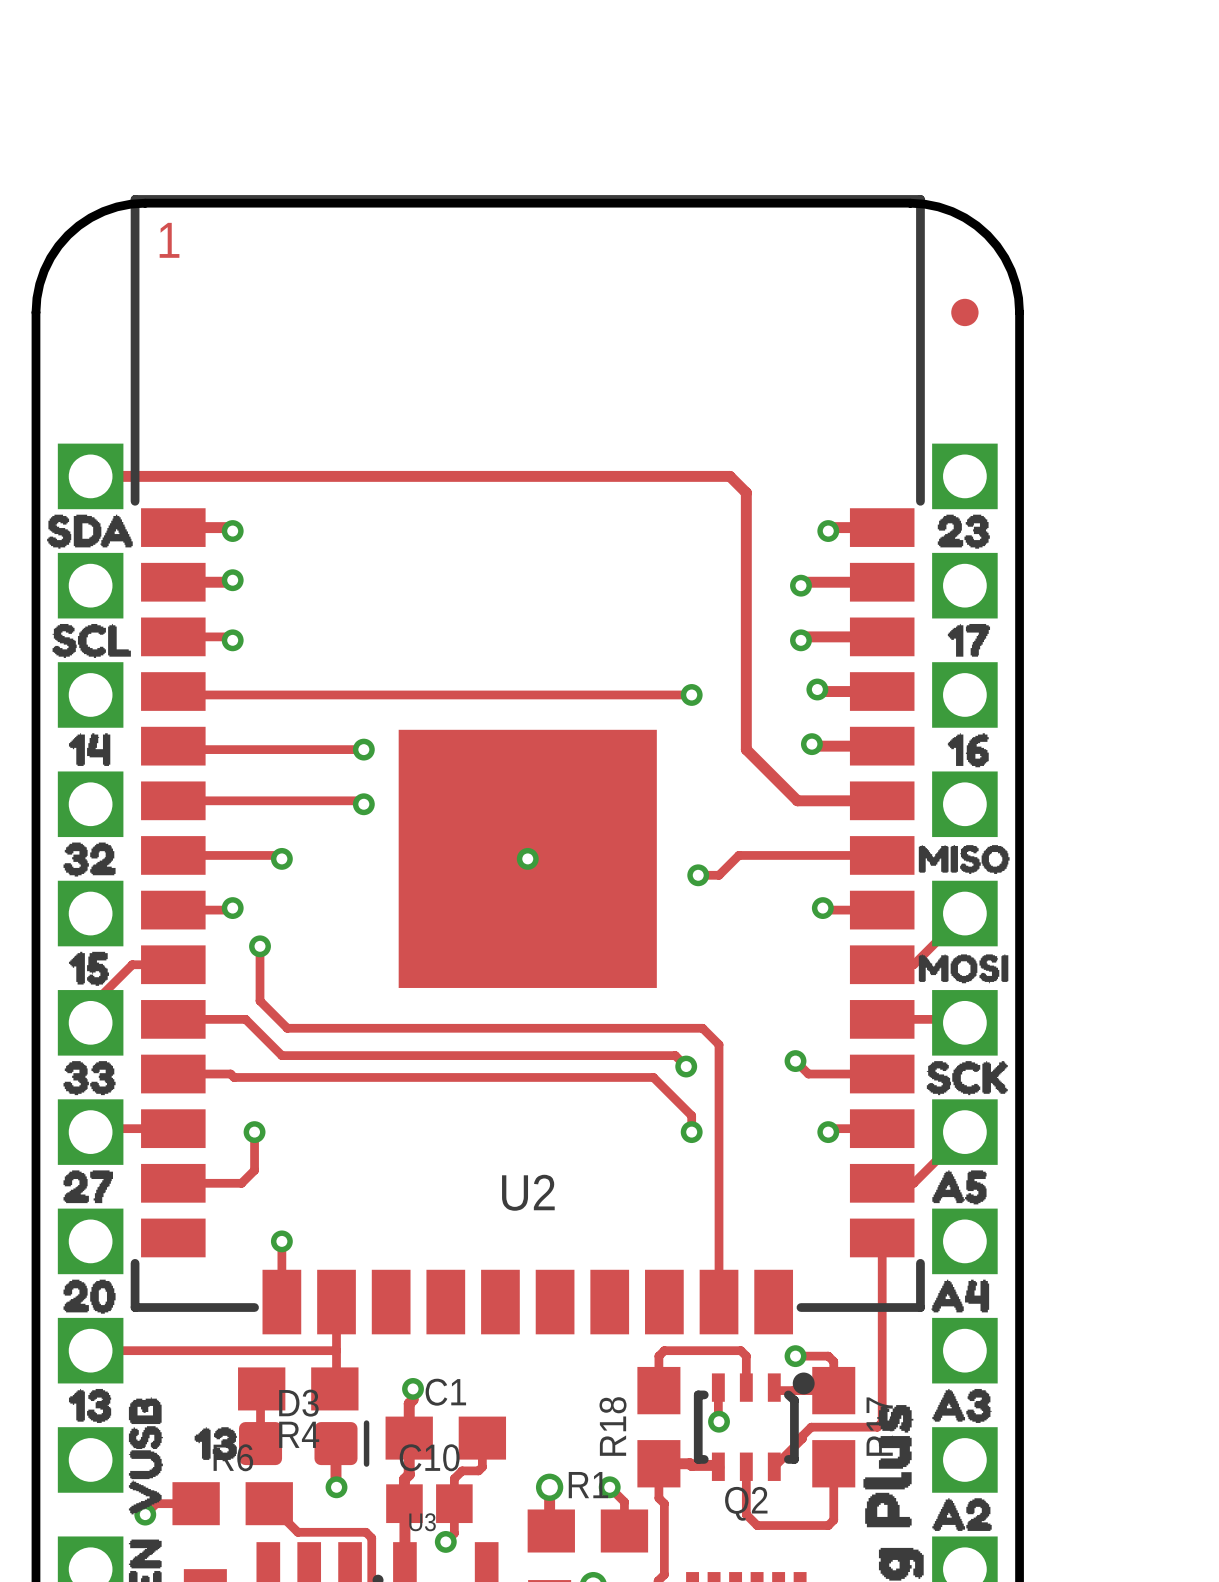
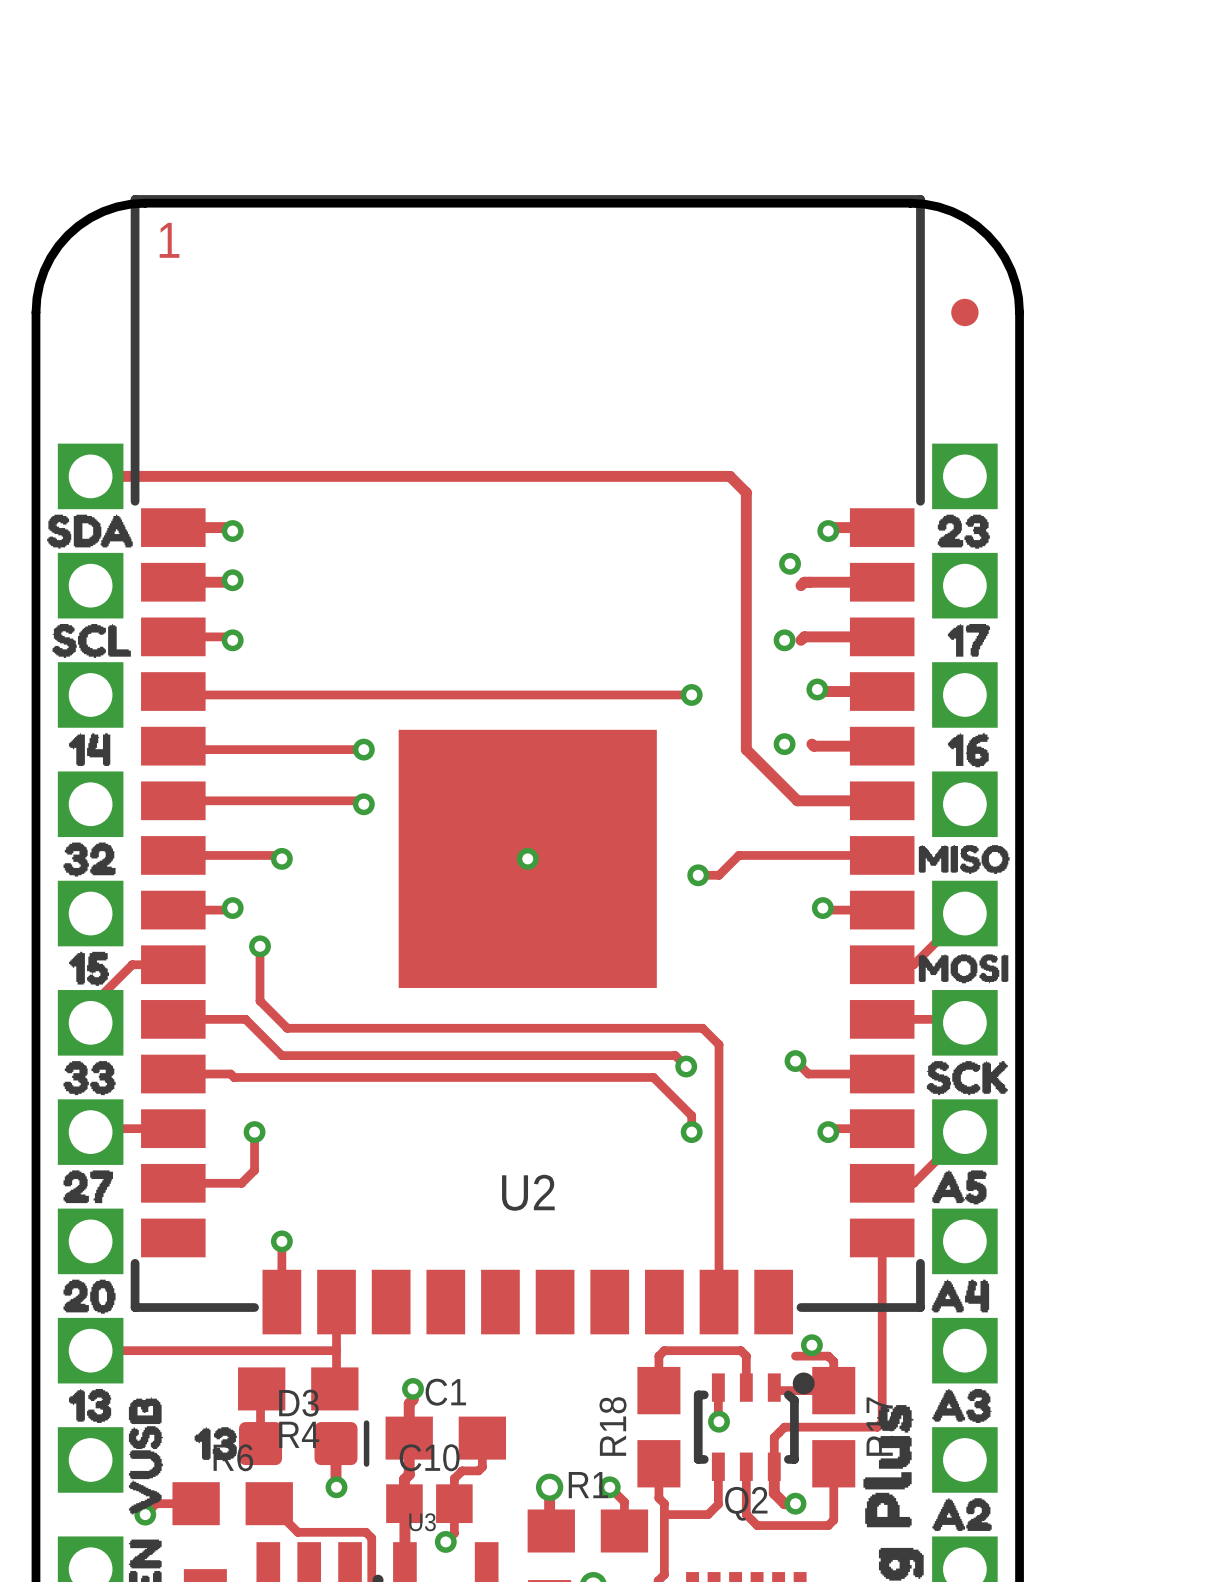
via position: (800, 585) -> (790, 563)
via position: (800, 640) -> (784, 640)
via position: (811, 744) -> (784, 744)
via position: (795, 1356) -> (811, 1345)
track: (811, 1427) (774, 1466) -> (811, 1427) (784, 1427) (774, 1437) (774, 1493) (784, 1503) (795, 1503)
track: (658, 1463) (690, 1463) (691, 1465) (717, 1465) (719, 1467) -> (664, 1514) (708, 1514) (718, 1504) (718, 1466)
via: none -> (795, 1503)

